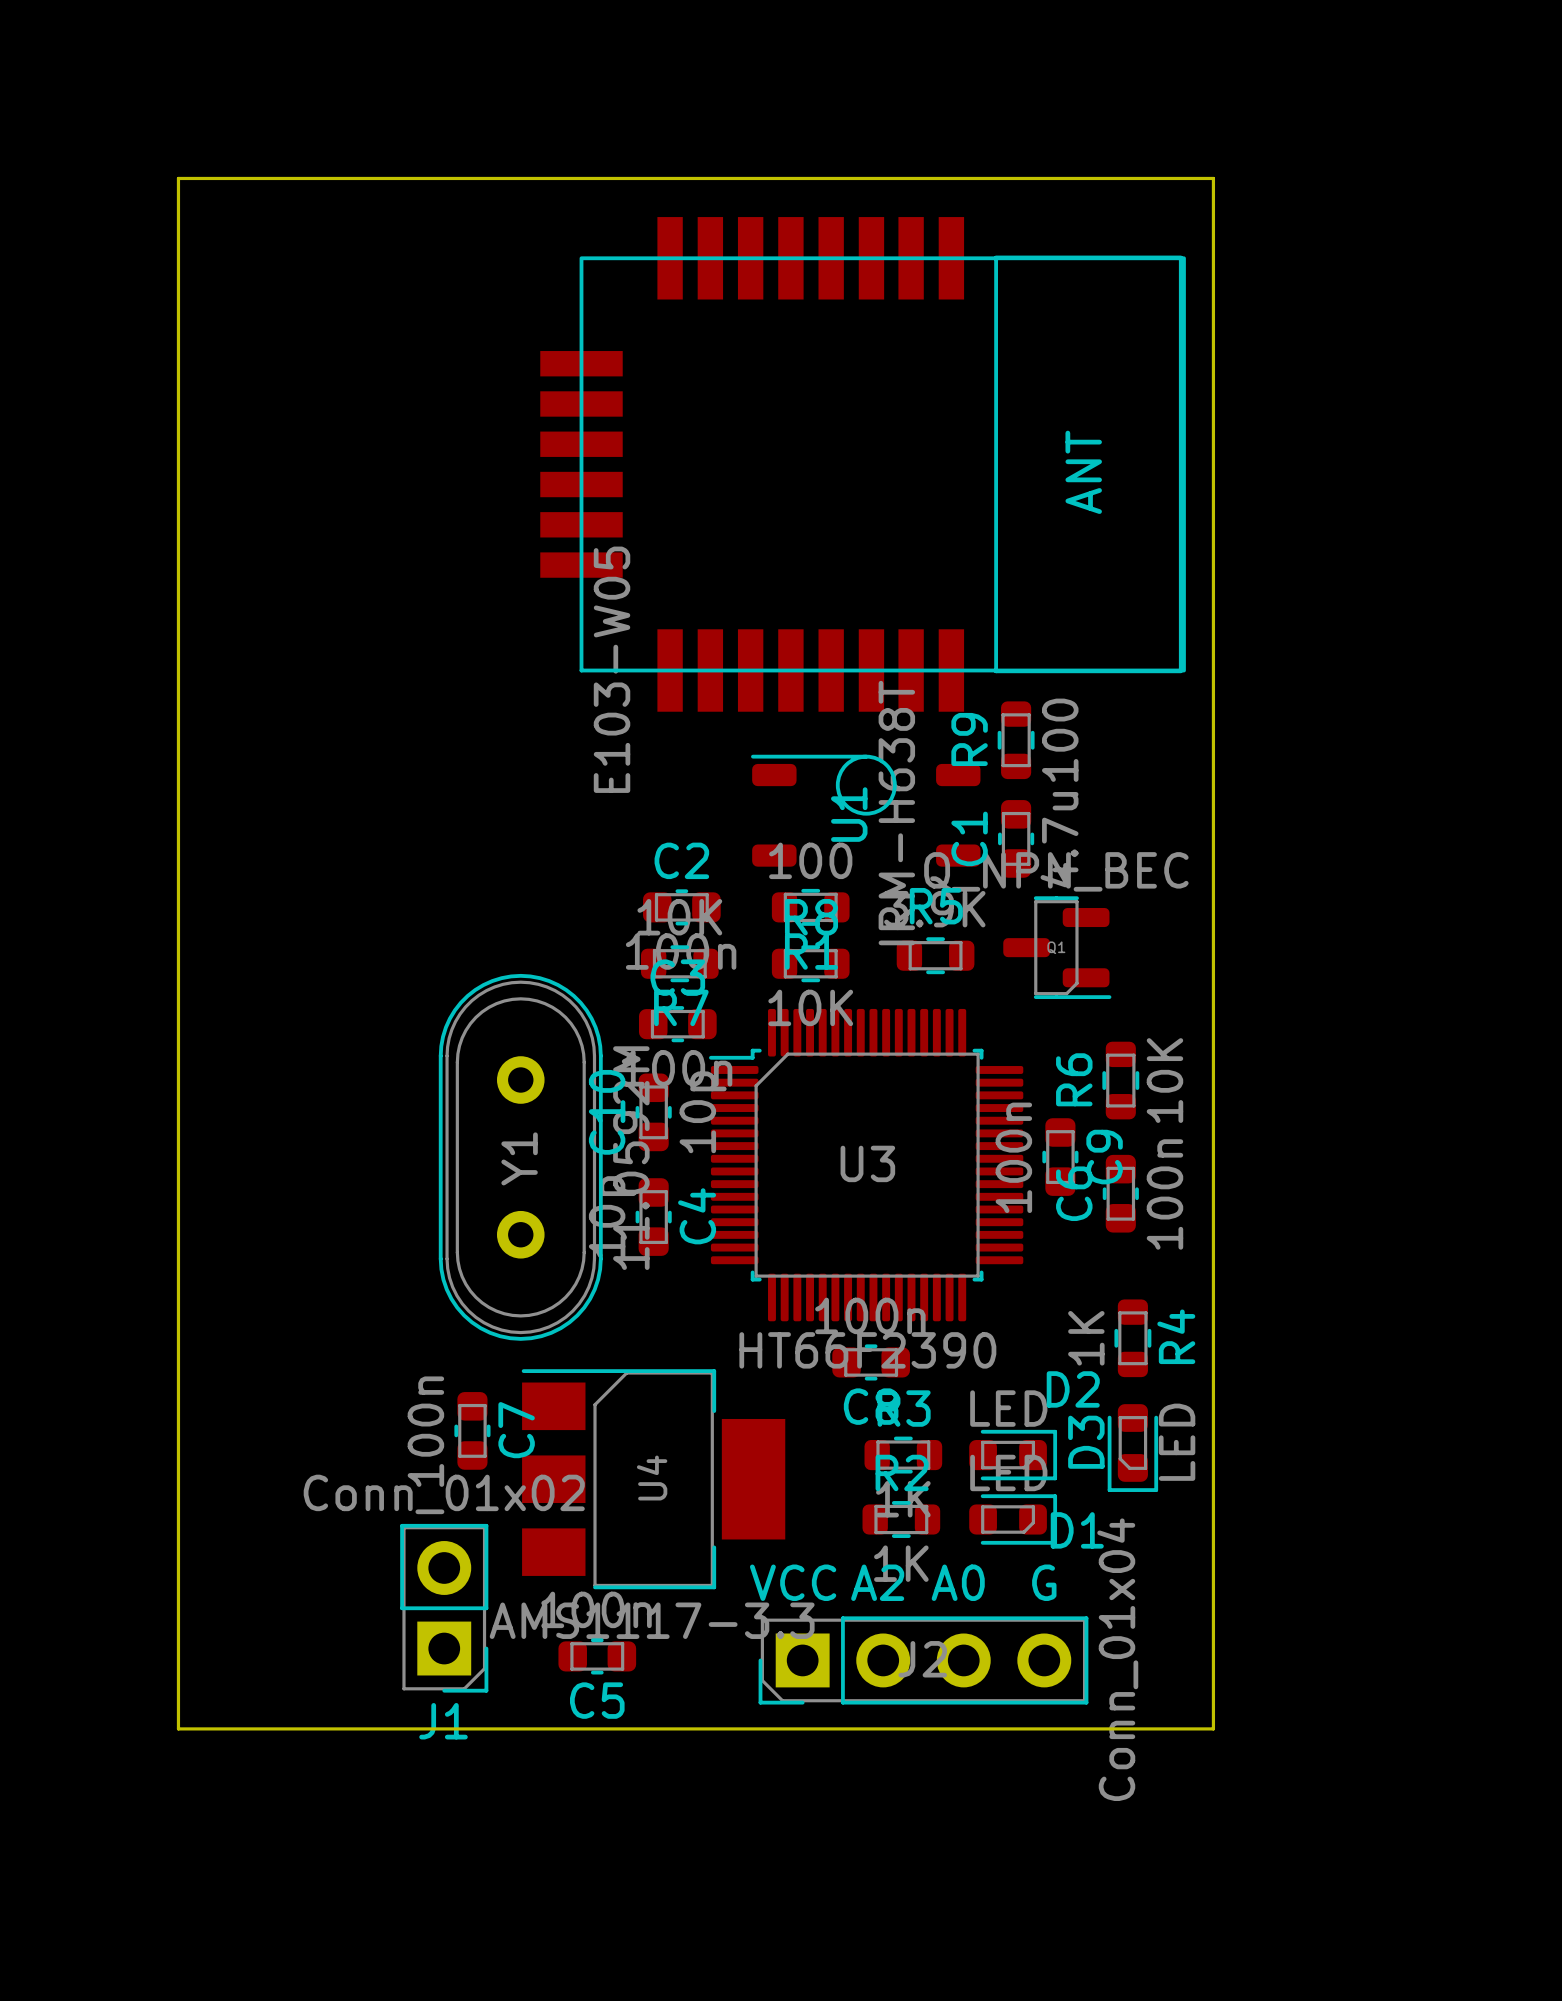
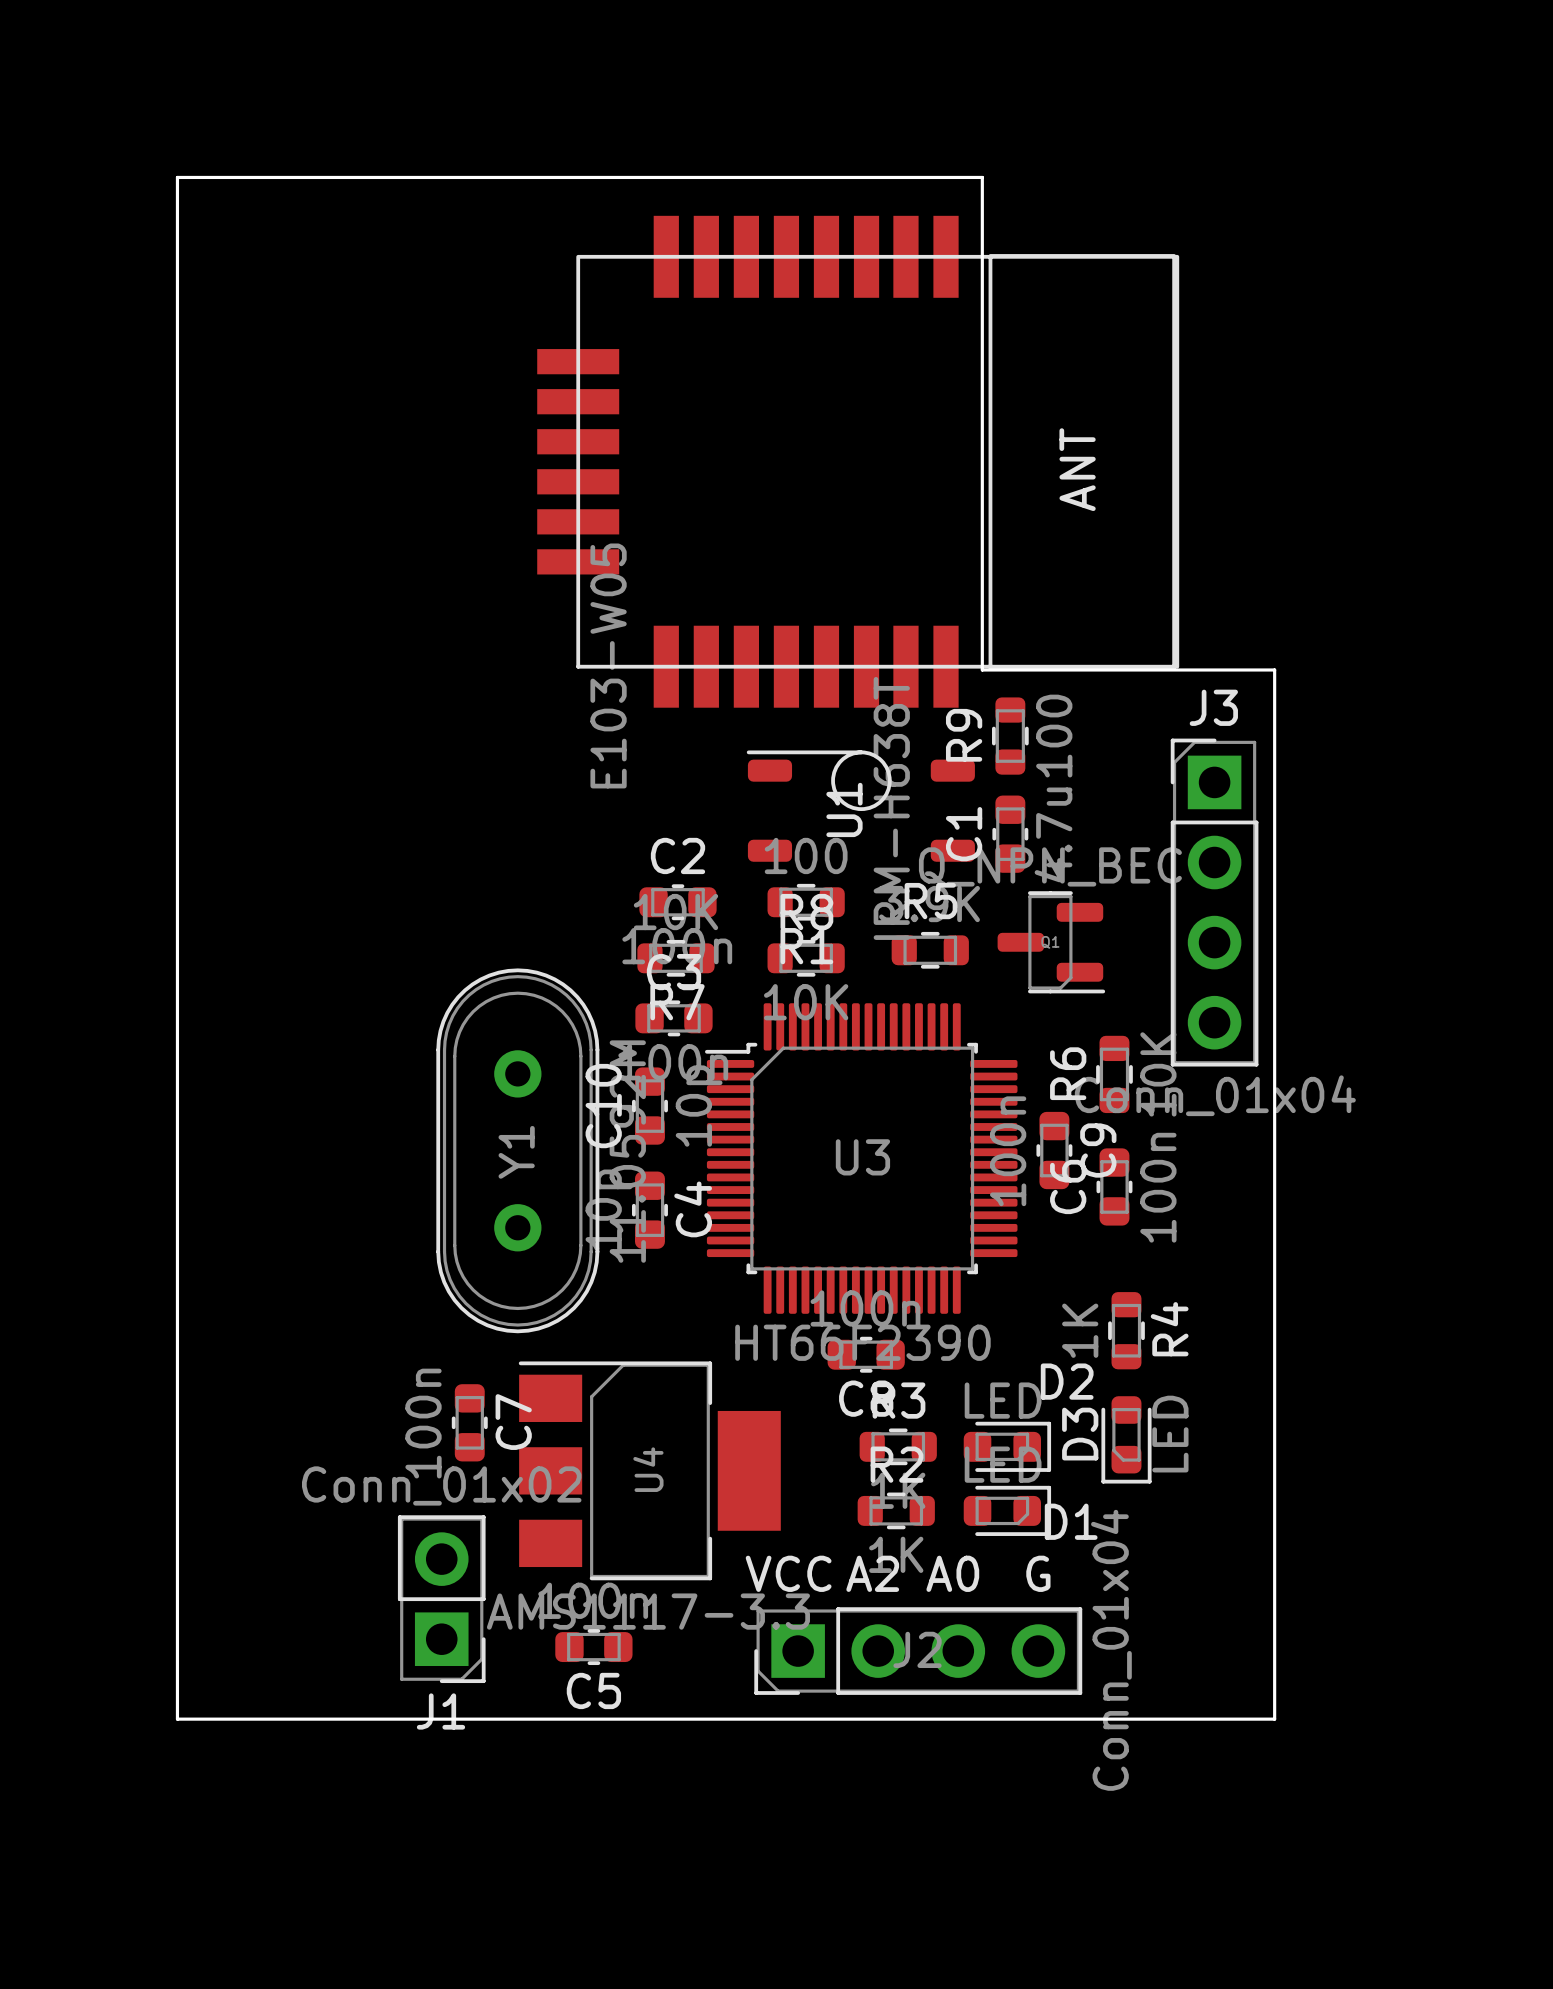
board edge: (987, 178) (1213, 178) (1213, 1728) -> (982, 177) (982, 669) (1274, 669) (1274, 1719) (1206, 1719)
J3: none -> Conn_01x04 (1214, 902)

